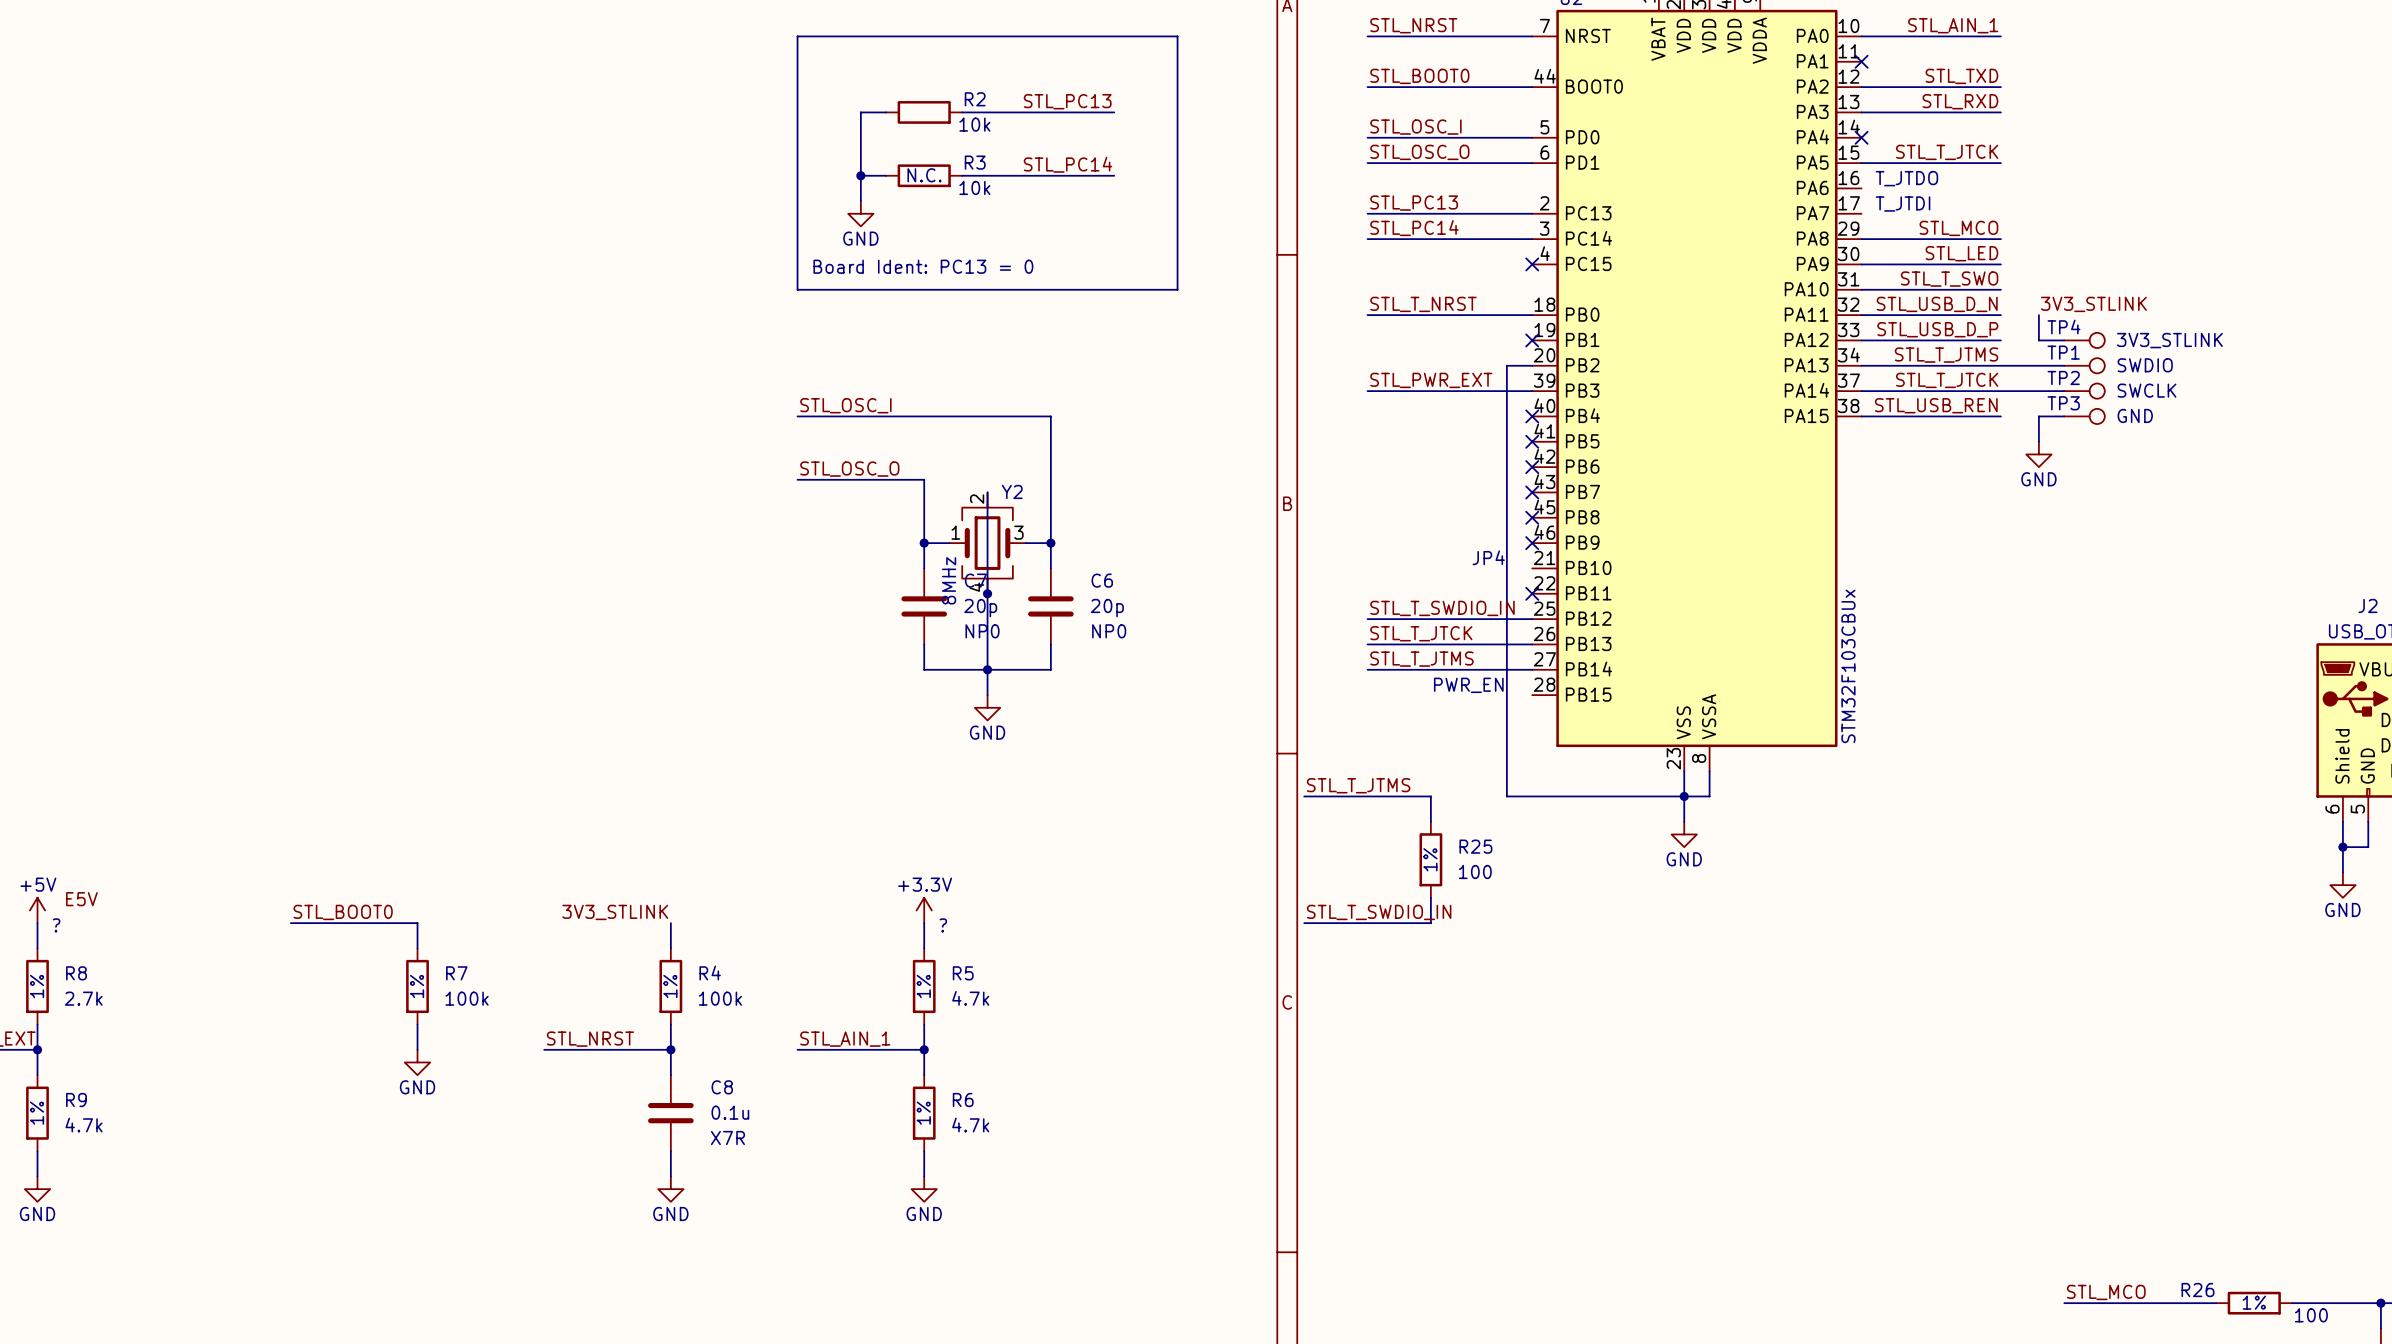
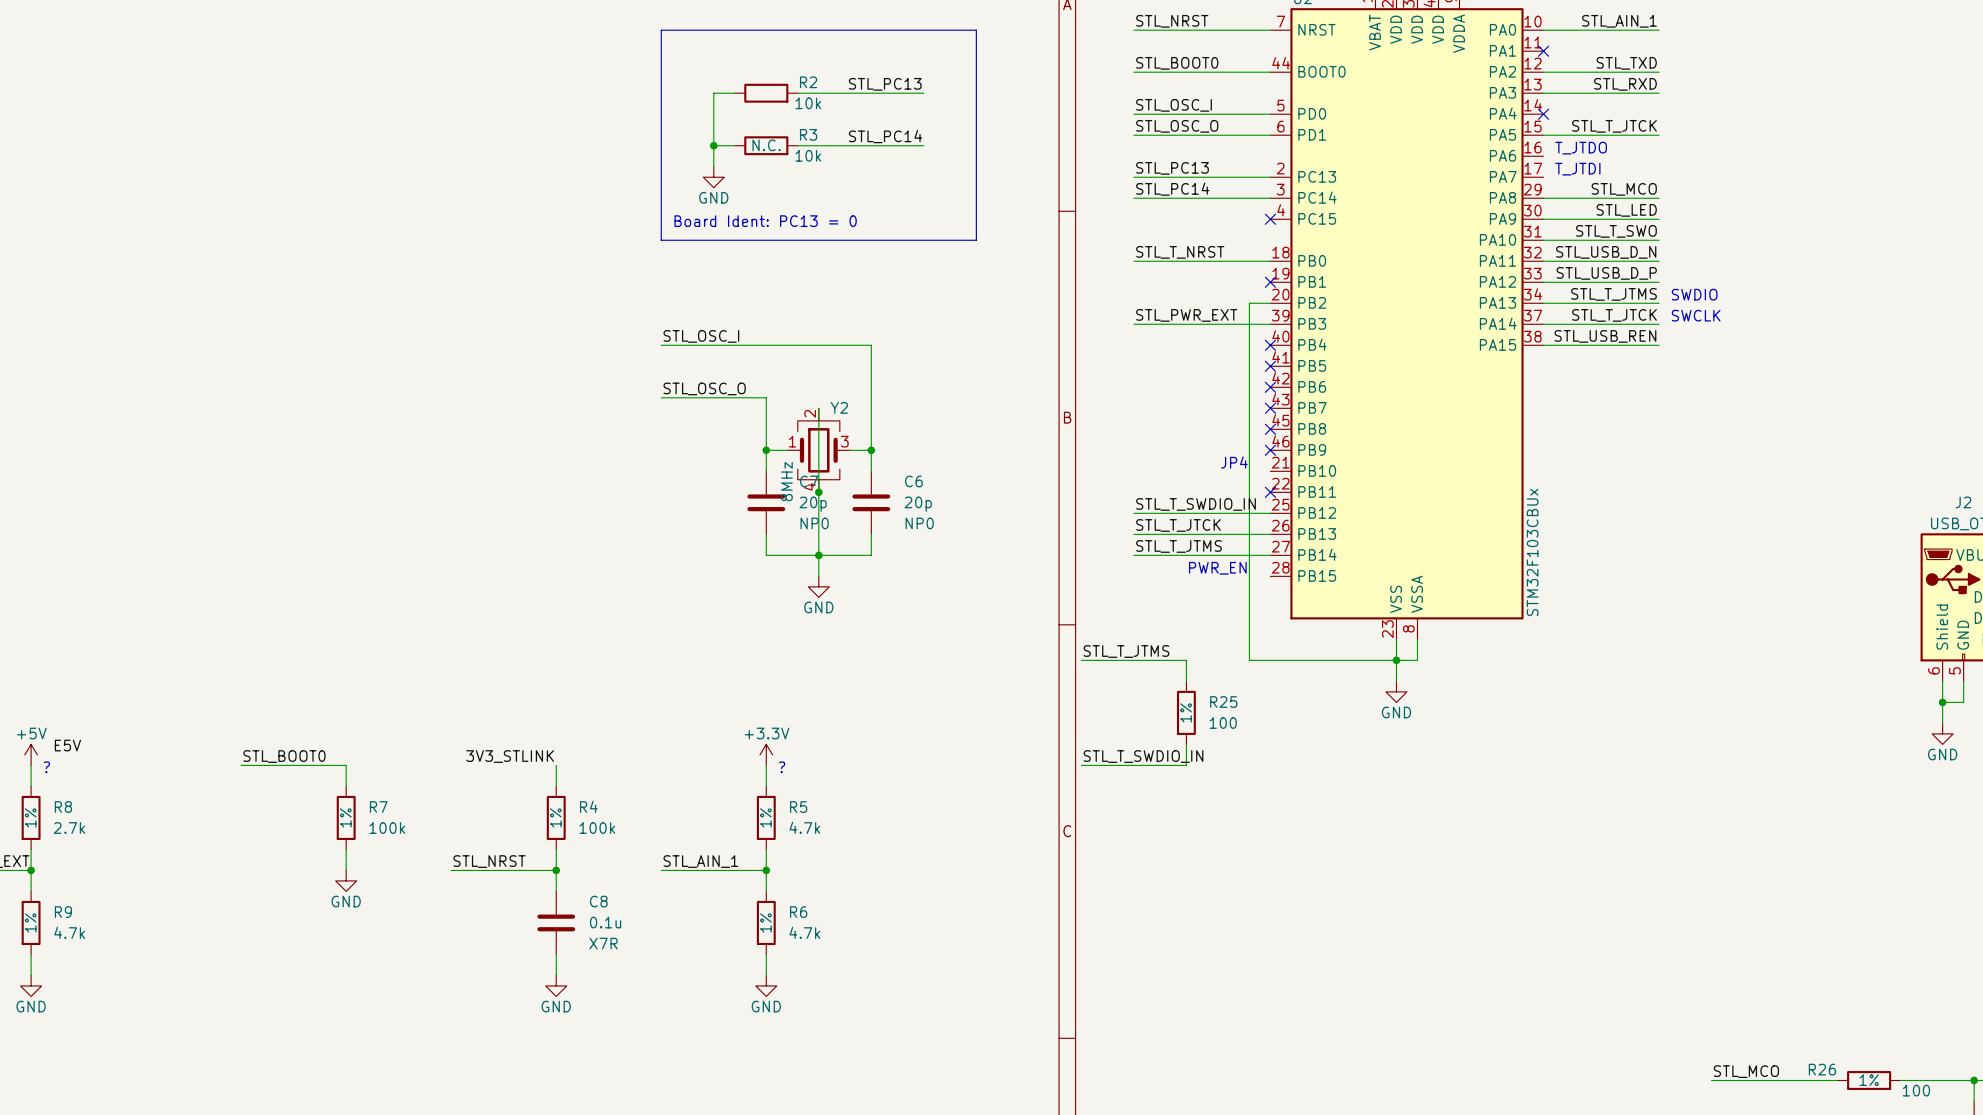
label: 3V3_STLINK (2093, 304) -> none
wire: (2038, 315) (2038, 340) (2064, 340) -> none
TP4: 3V3_STLINK (2084, 340) -> none
text: none -> SWDIO (1694, 294)
wire: (2000, 365) (2064, 365) -> none
TP1: SWDIO (2084, 365) -> none
text: none -> SWCLK (1696, 315)
wire: (2000, 391) (2064, 391) -> none
TP2: SWCLK (2084, 391) -> none
wire: (2064, 416) (2038, 416) (2038, 441) -> none
TP3: GND (2084, 416) -> none
power symbol: GND (2038, 454) -> none

